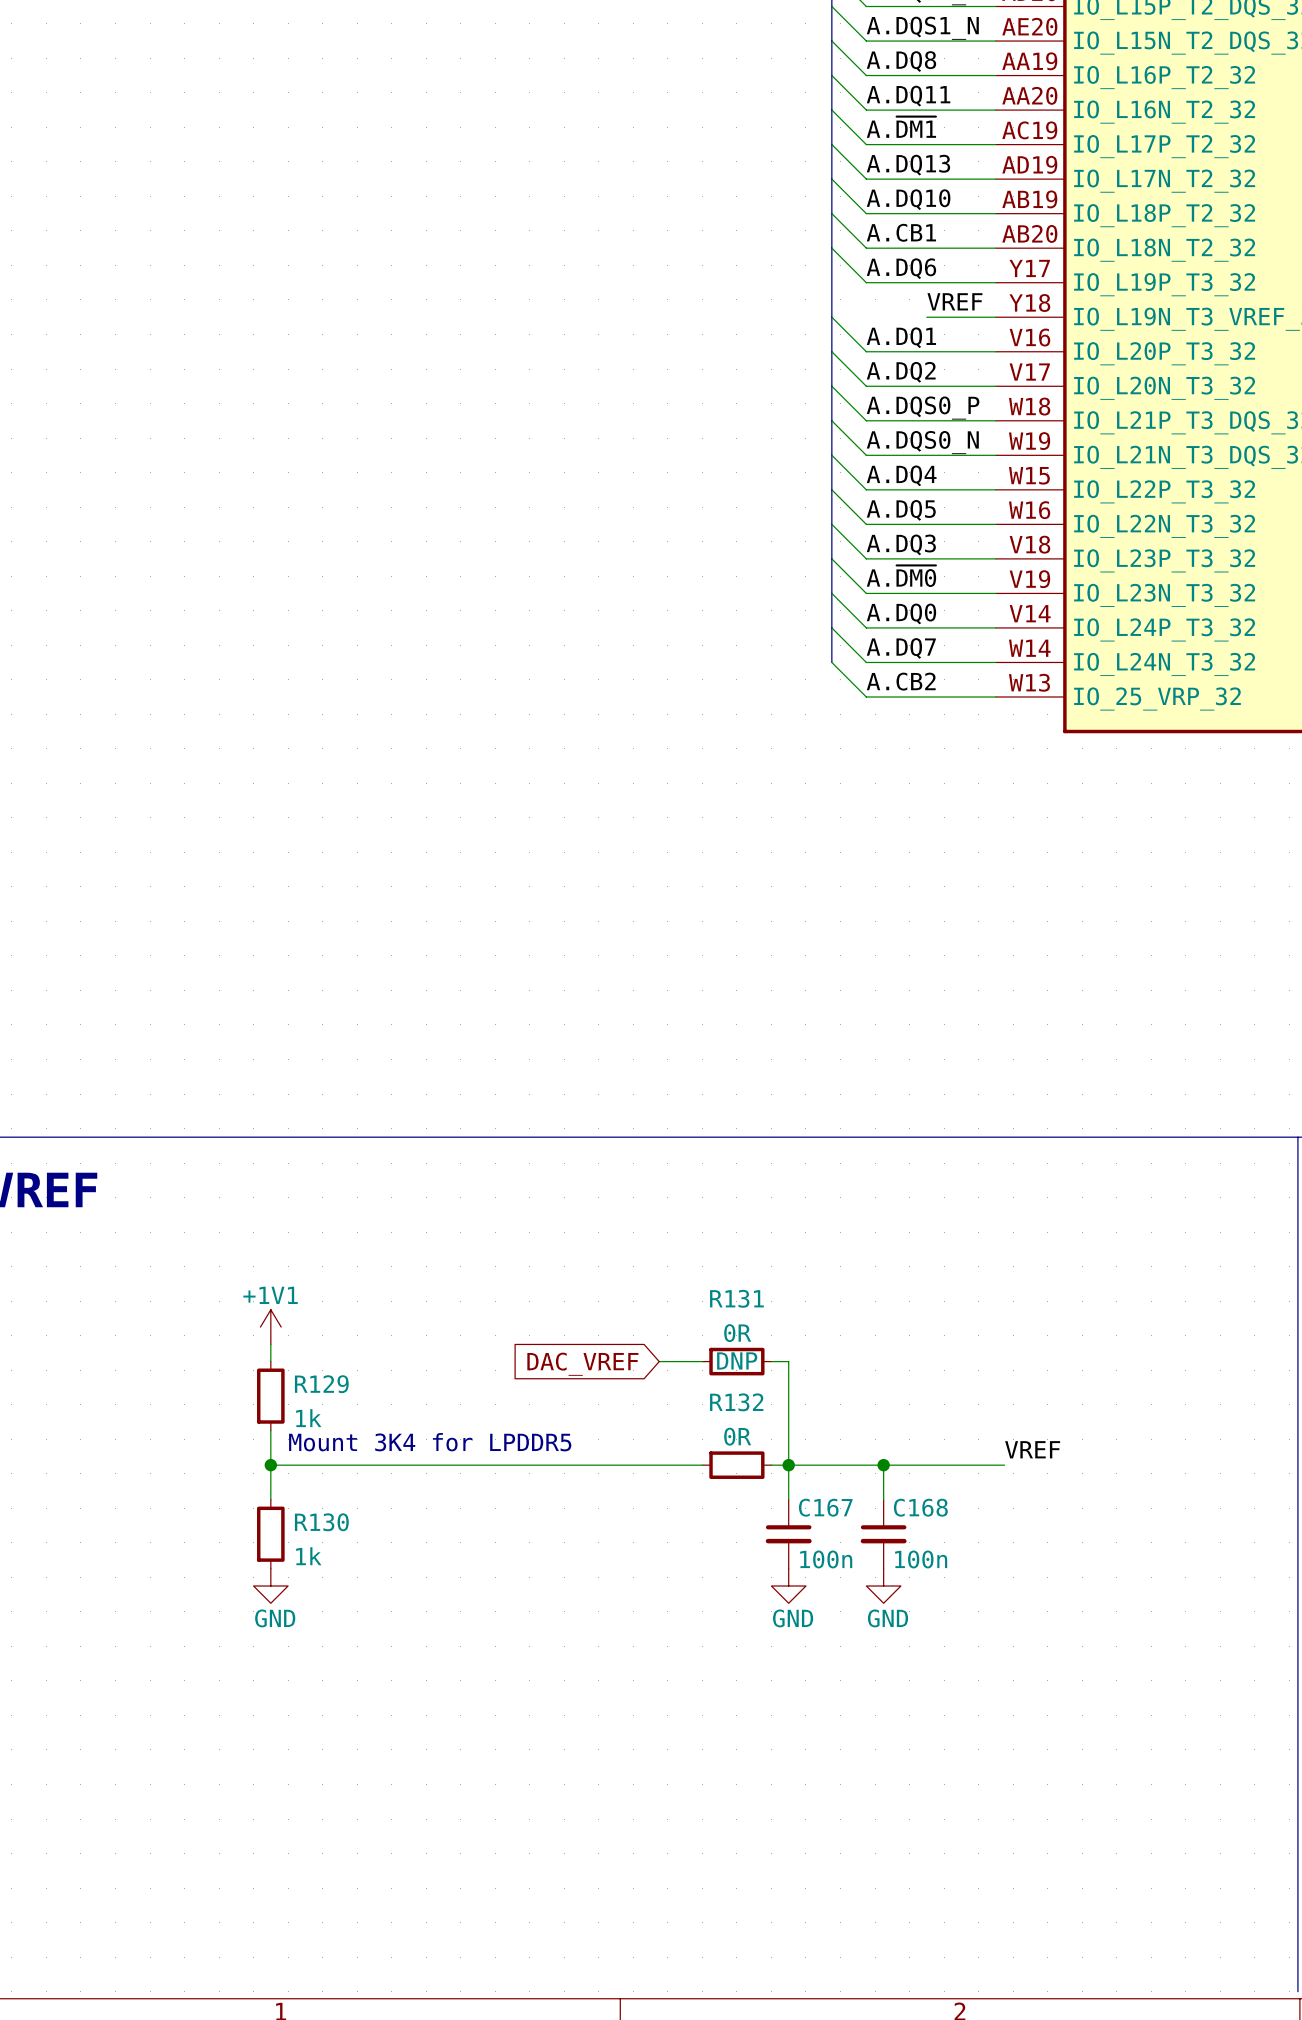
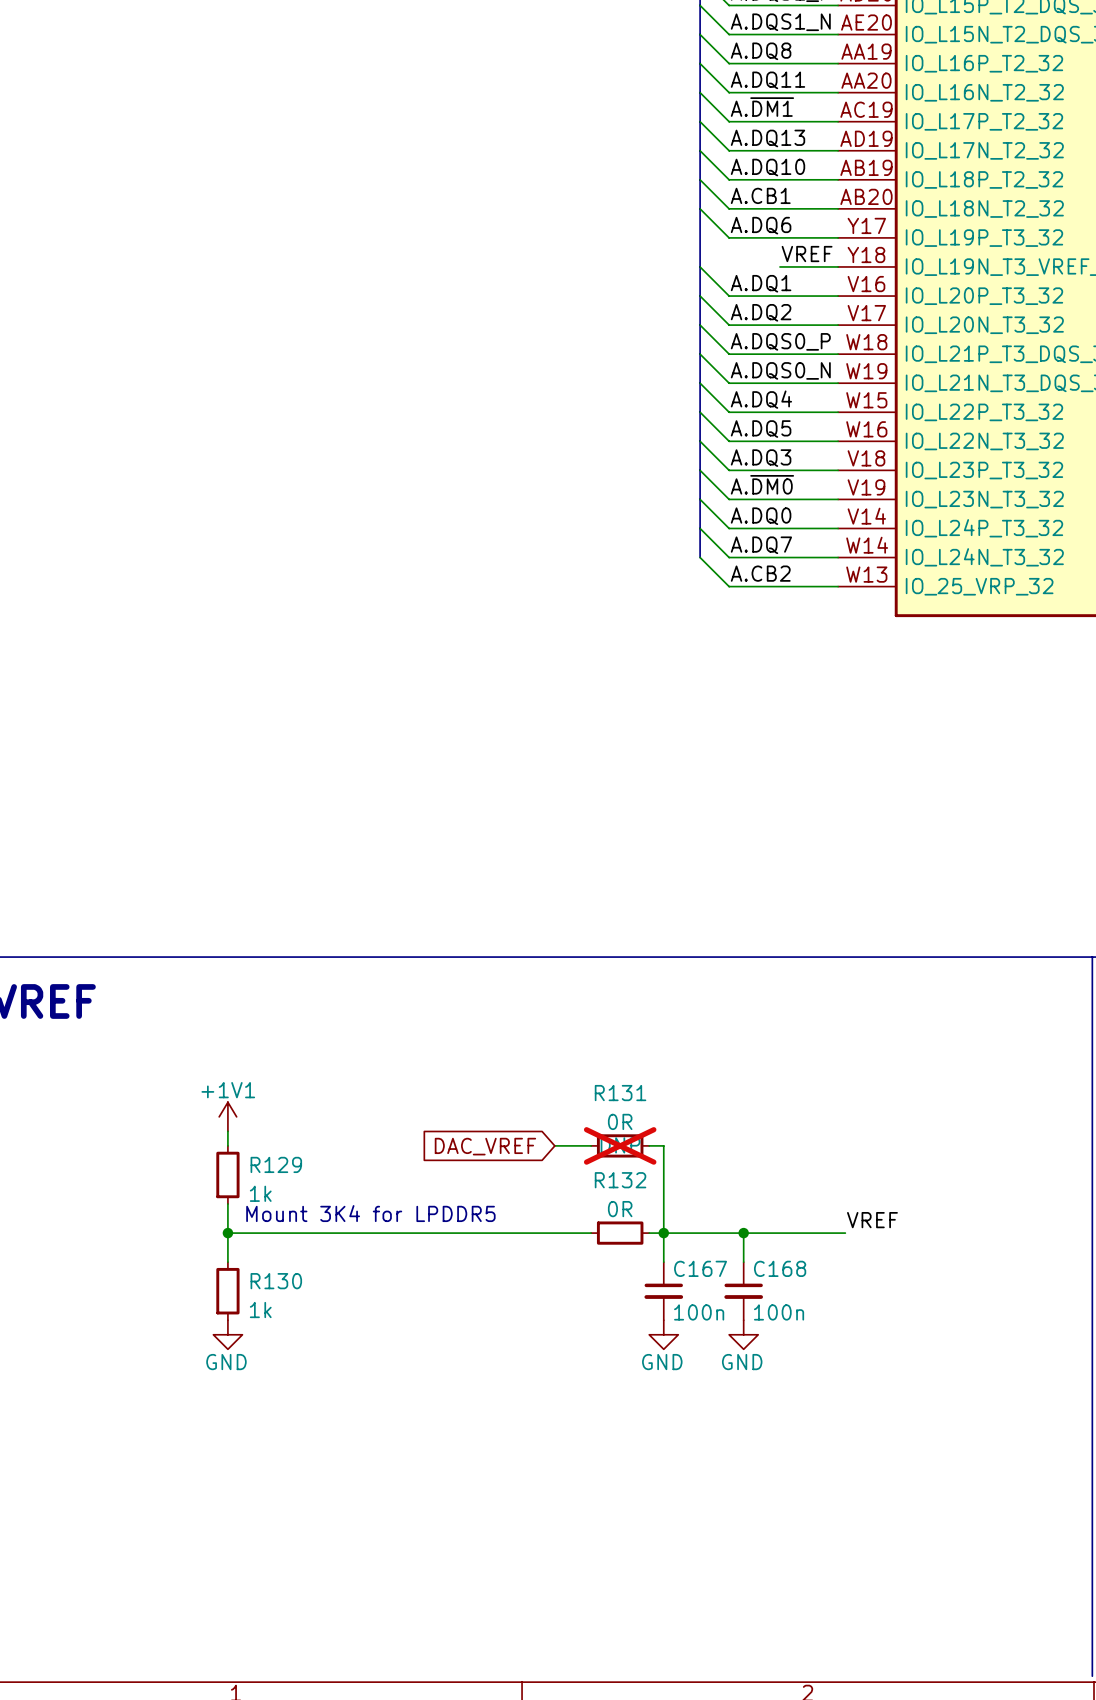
R131 do-not-place cross: none -> (620, 1145)

